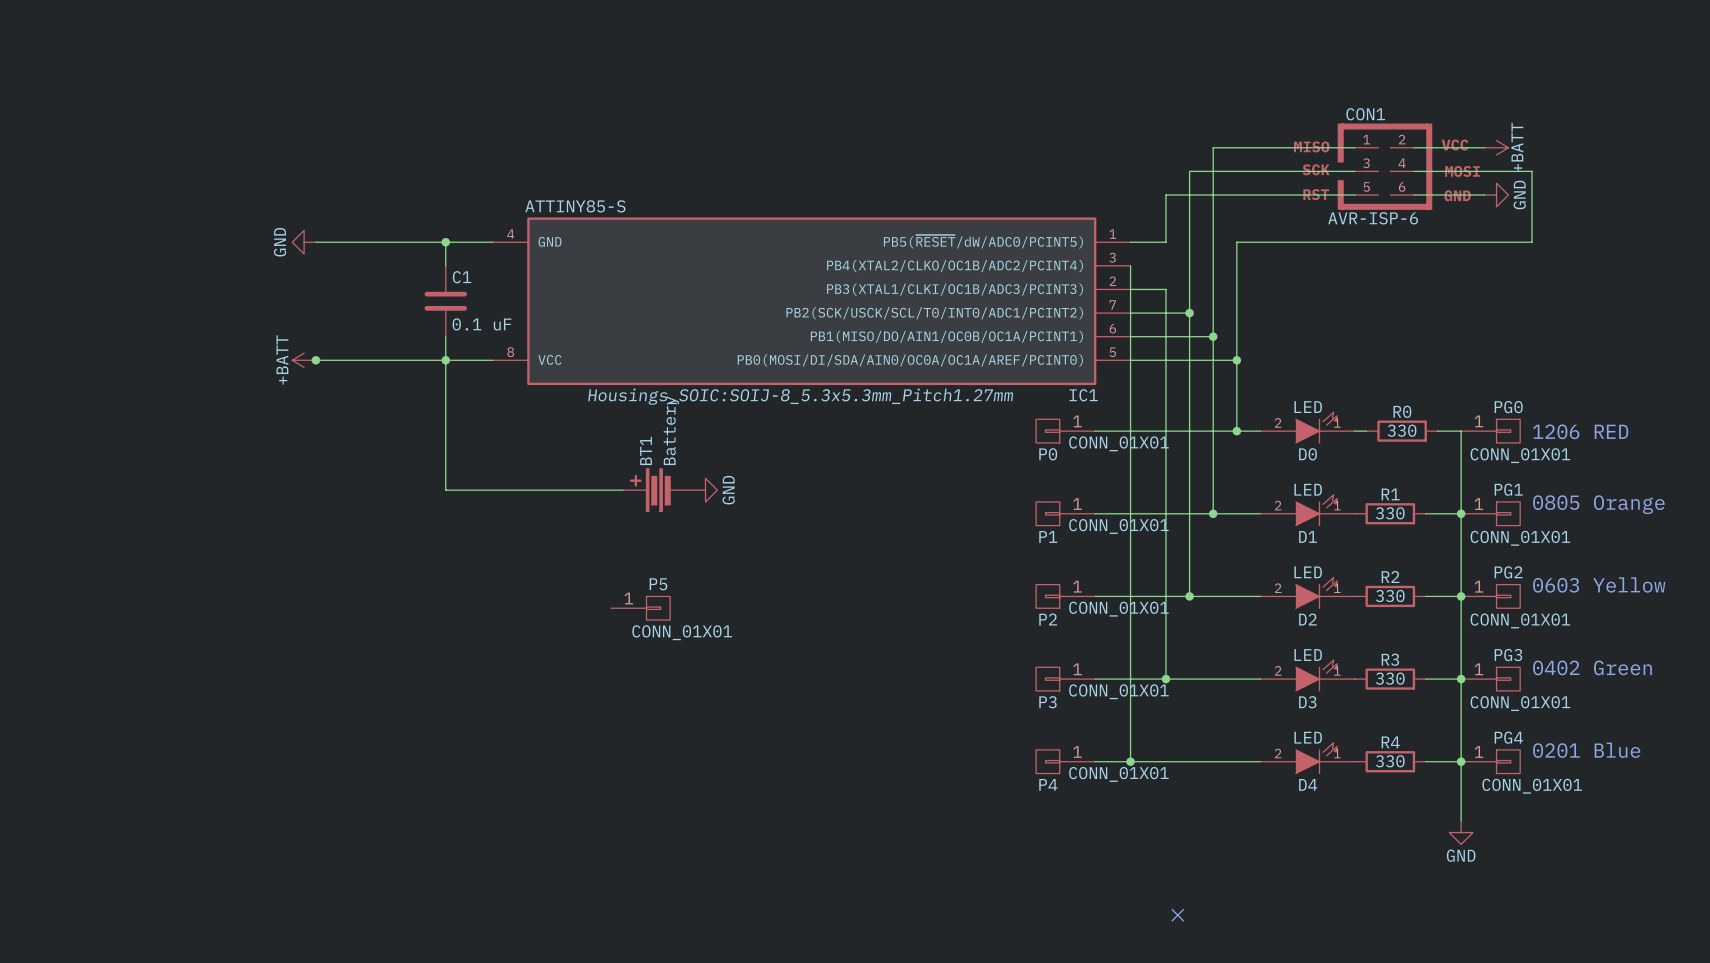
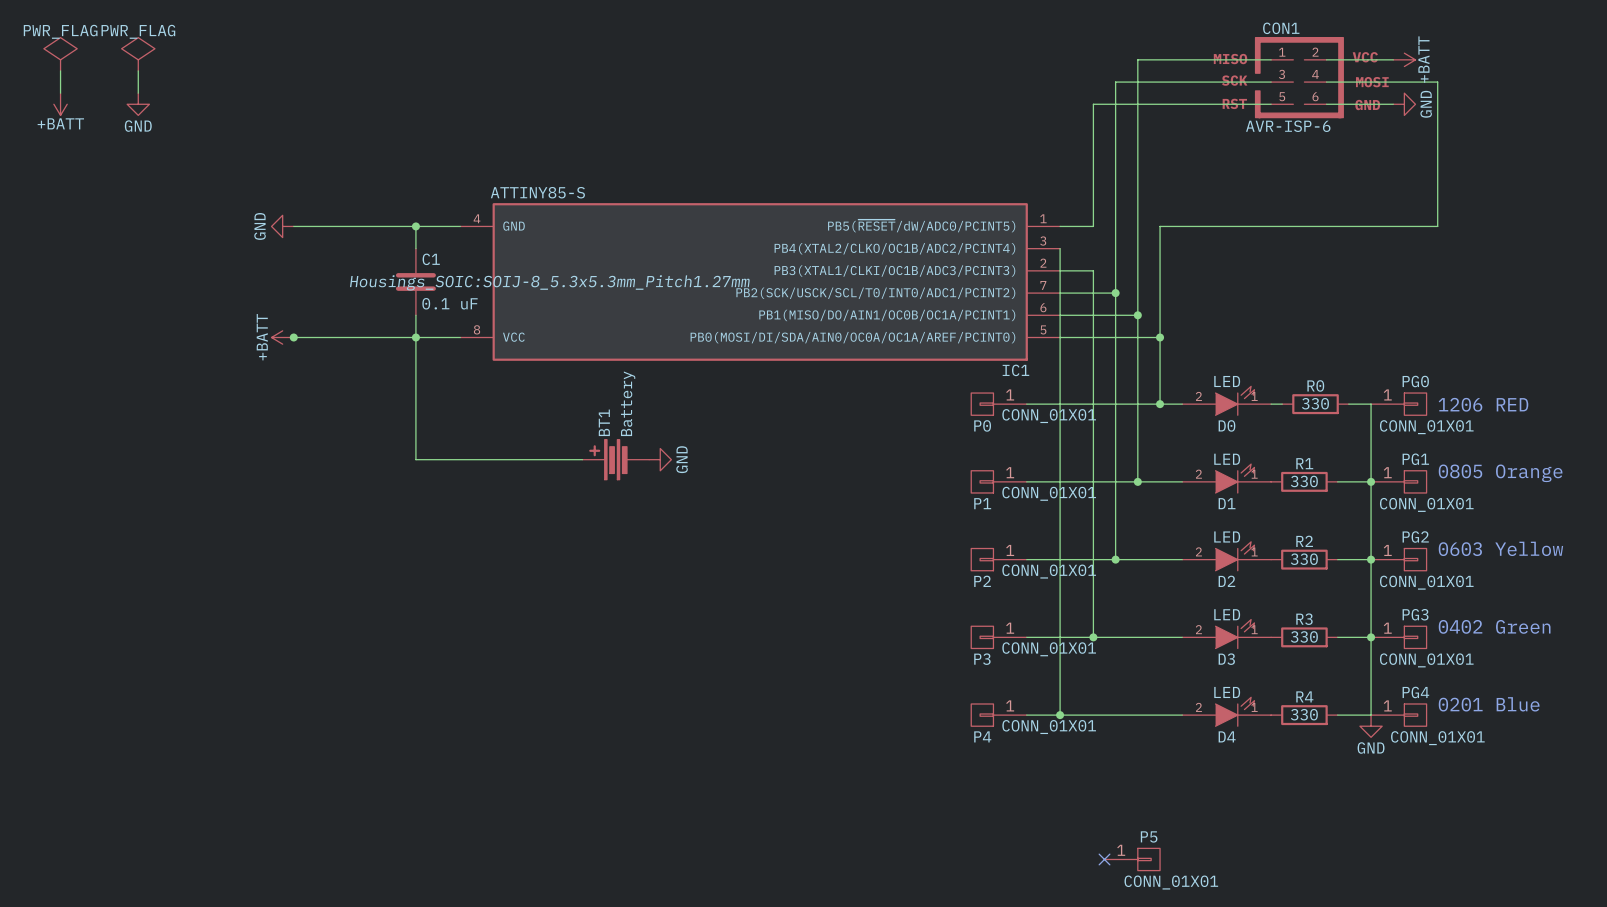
power symbol: none -> PWR_FLAG (60, 54)
power symbol: none -> PWR_FLAG (138, 54)
wire: none -> (60, 70) (60, 93)
wire: none -> (138, 70) (138, 93)
power symbol: none -> +BATT (60, 104)
power symbol: none -> GND (138, 104)
wire: (1213, 147) (1354, 147) -> (1137, 137) (1137, 59) (1271, 59)
wire: (1413, 147) (1484, 147) -> (1326, 59) (1393, 59)
power symbol position: +BATT (1496, 147) -> +BATT (1404, 59)
CON1 position: (1384, 166) -> (1299, 77)
wire: (1189, 171) (1354, 171) -> (1115, 159) (1115, 82) (1271, 82)
wire: (1413, 171) (1531, 171) -> (1326, 82) (1437, 82) (1437, 159)
wire: (1165, 195) (1354, 195) -> (1093, 182) (1093, 104) (1271, 104)
wire: (1413, 195) (1484, 195) -> (1326, 104) (1393, 104)
power symbol position: GND (1496, 195) -> GND (1404, 104)
IC1 text position: Housings_SOIC:SOIJ-8_5.3x5.3mm_Pitch1.27mm (800, 396) -> Housings_SOIC:SOIJ-8_5.3x5.3mm_Pitch1.27mm (549, 282)
P5 position: (640, 608) -> (1132, 859)
wire: (1461, 761) (1461, 820) -> none
junction: (1461, 761) -> none
power symbol position: GND (1461, 832) -> GND (1371, 726)

